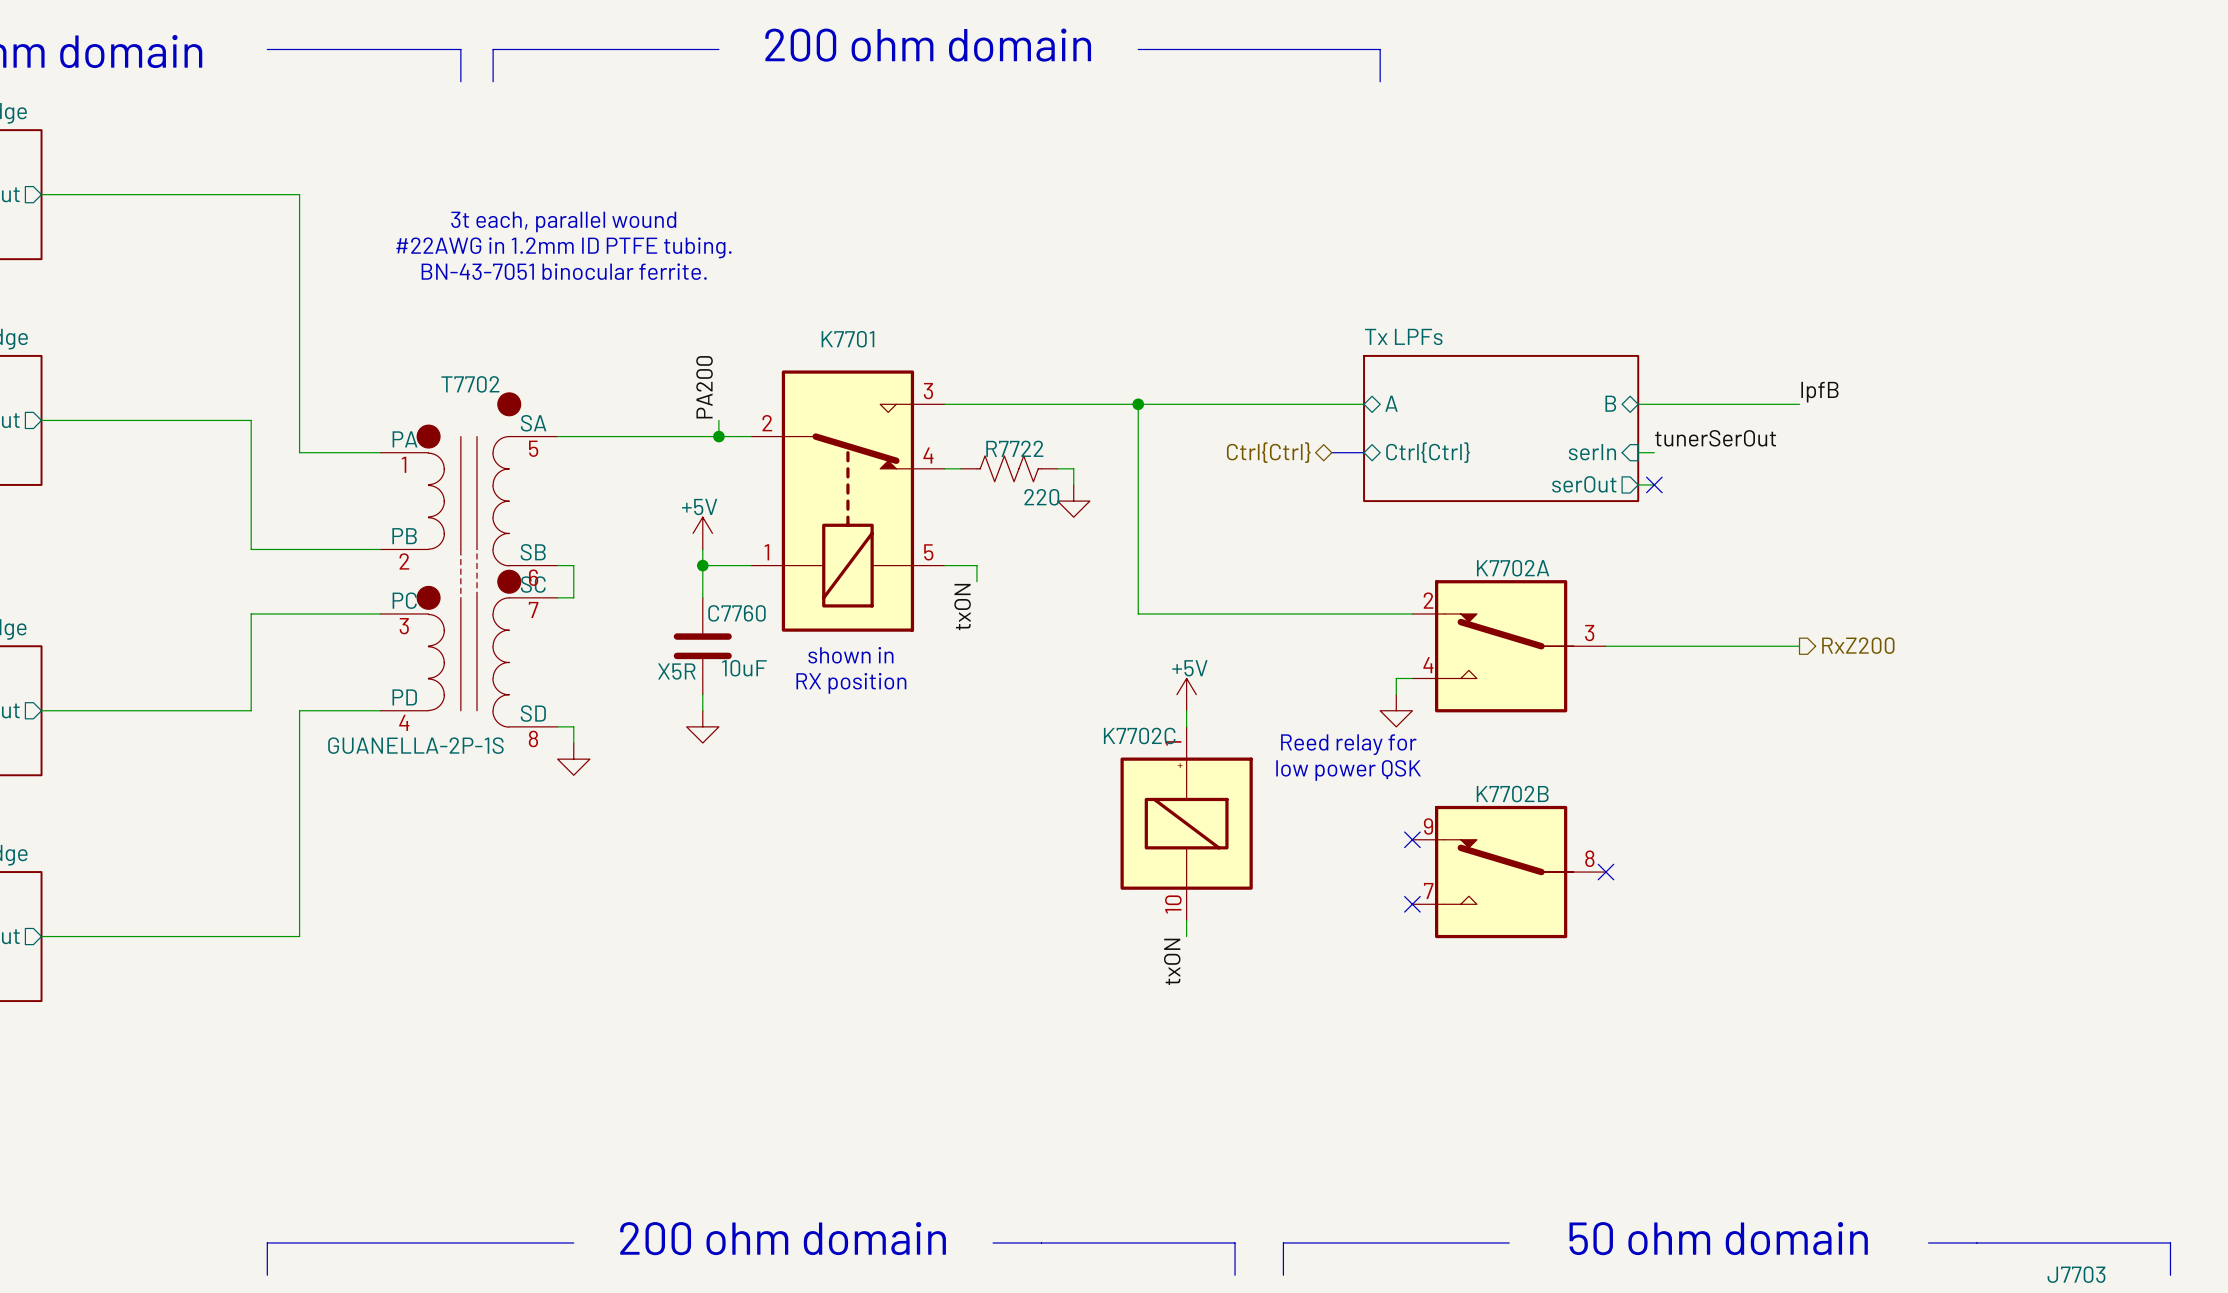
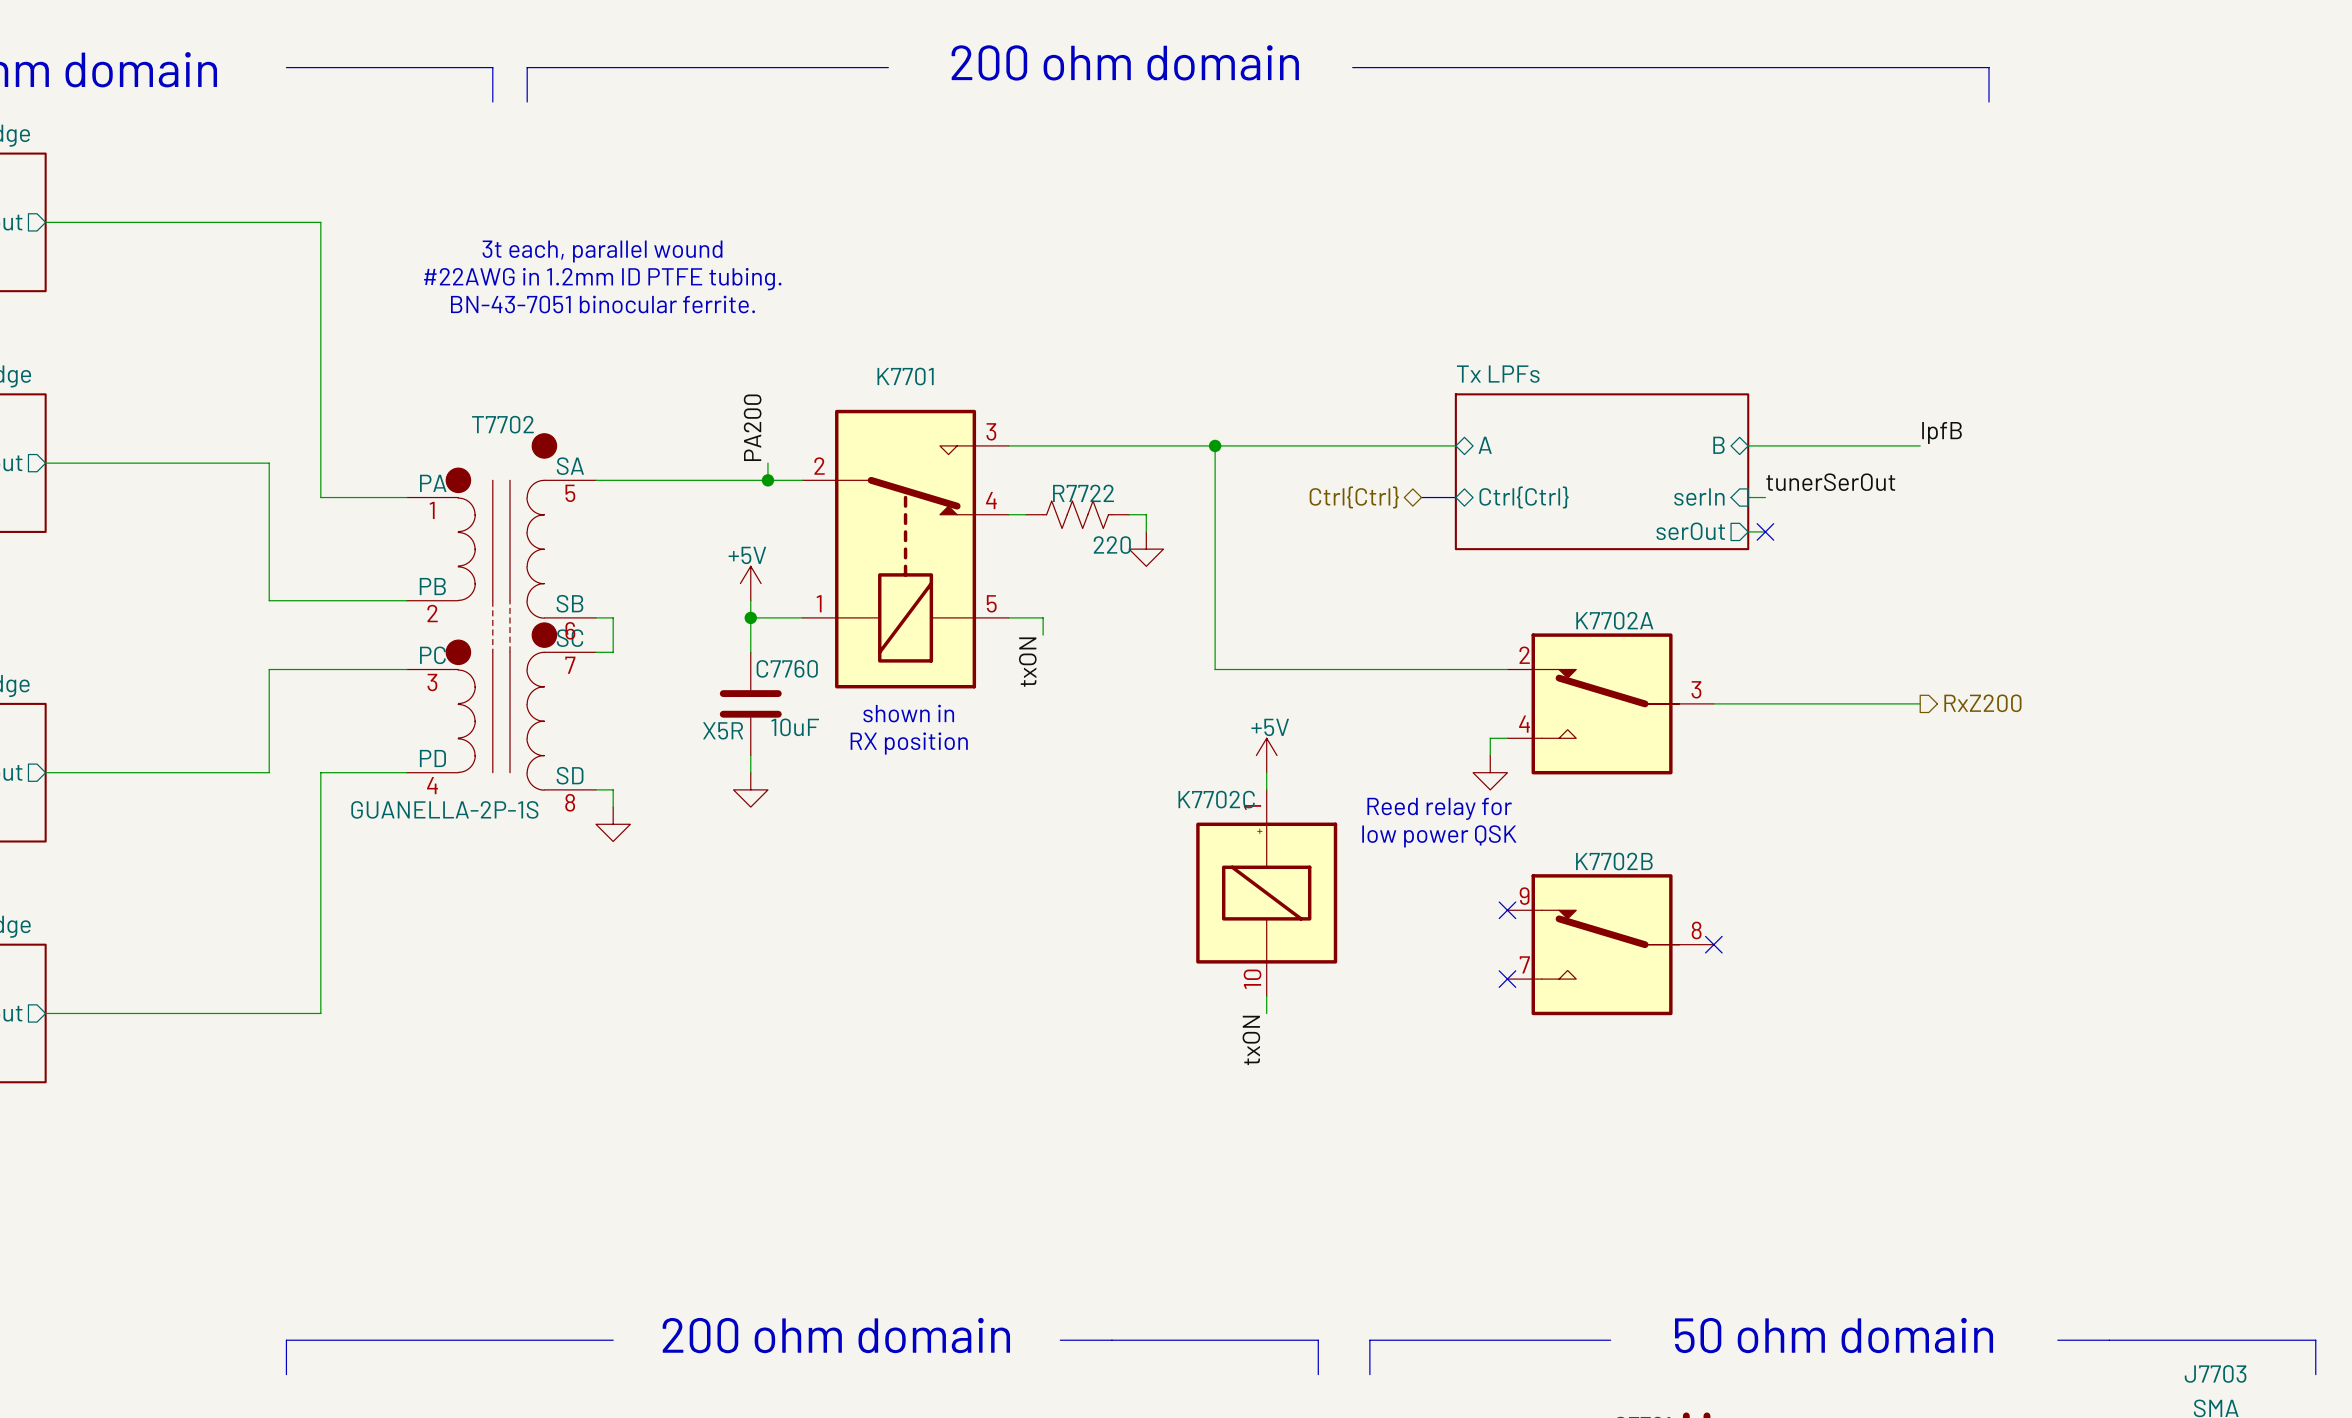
text position: 200 ohm domain (928, 45) -> 200 ohm domain (1125, 62)
line: none -> (767, 67) (888, 67)
line: (1138, 49) (1267, 49) -> none
line: (1380, 49) (1380, 81) -> (1473, 67) (1989, 67) (1989, 101)

